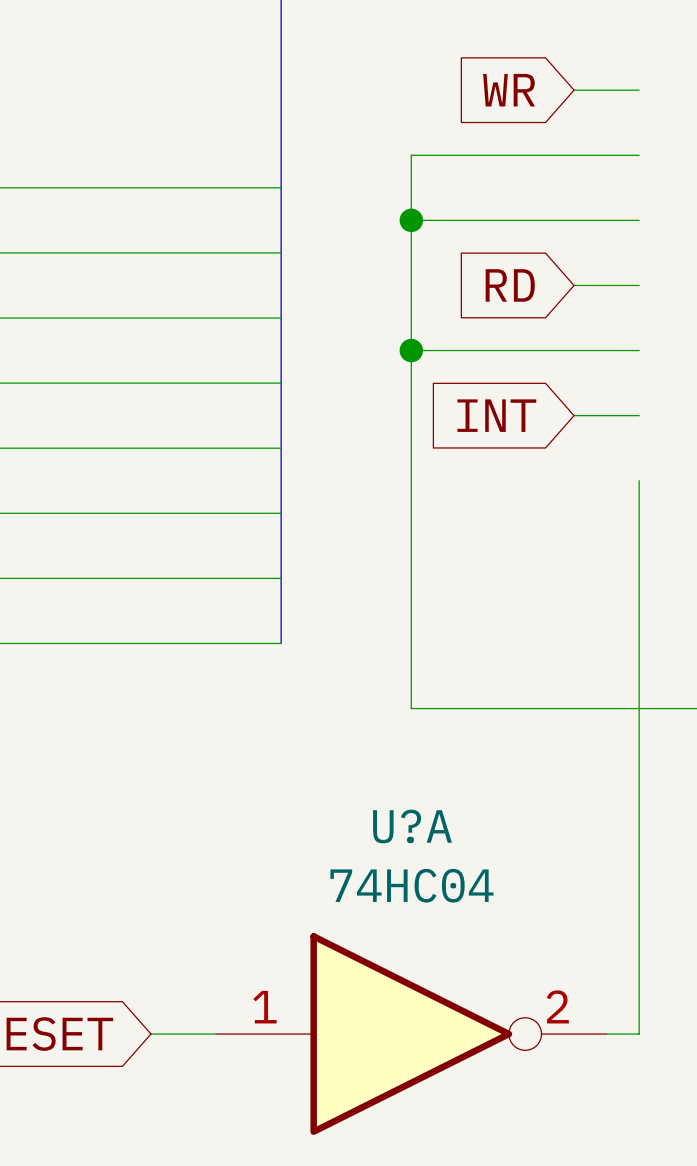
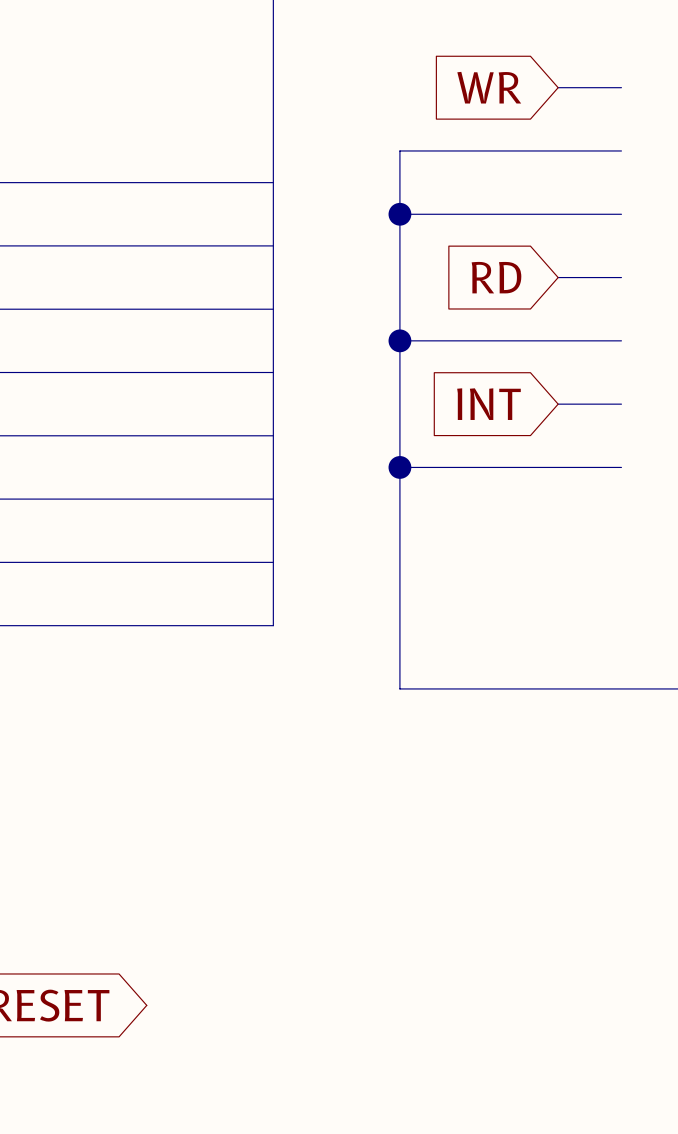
junction: none -> (399, 467)
wire: (639, 480) (639, 1034) (606, 1034) -> (621, 467) (399, 467)
wire: (150, 1034) (216, 1034) -> none
U?A: 74HC04 (411, 1034) -> none

